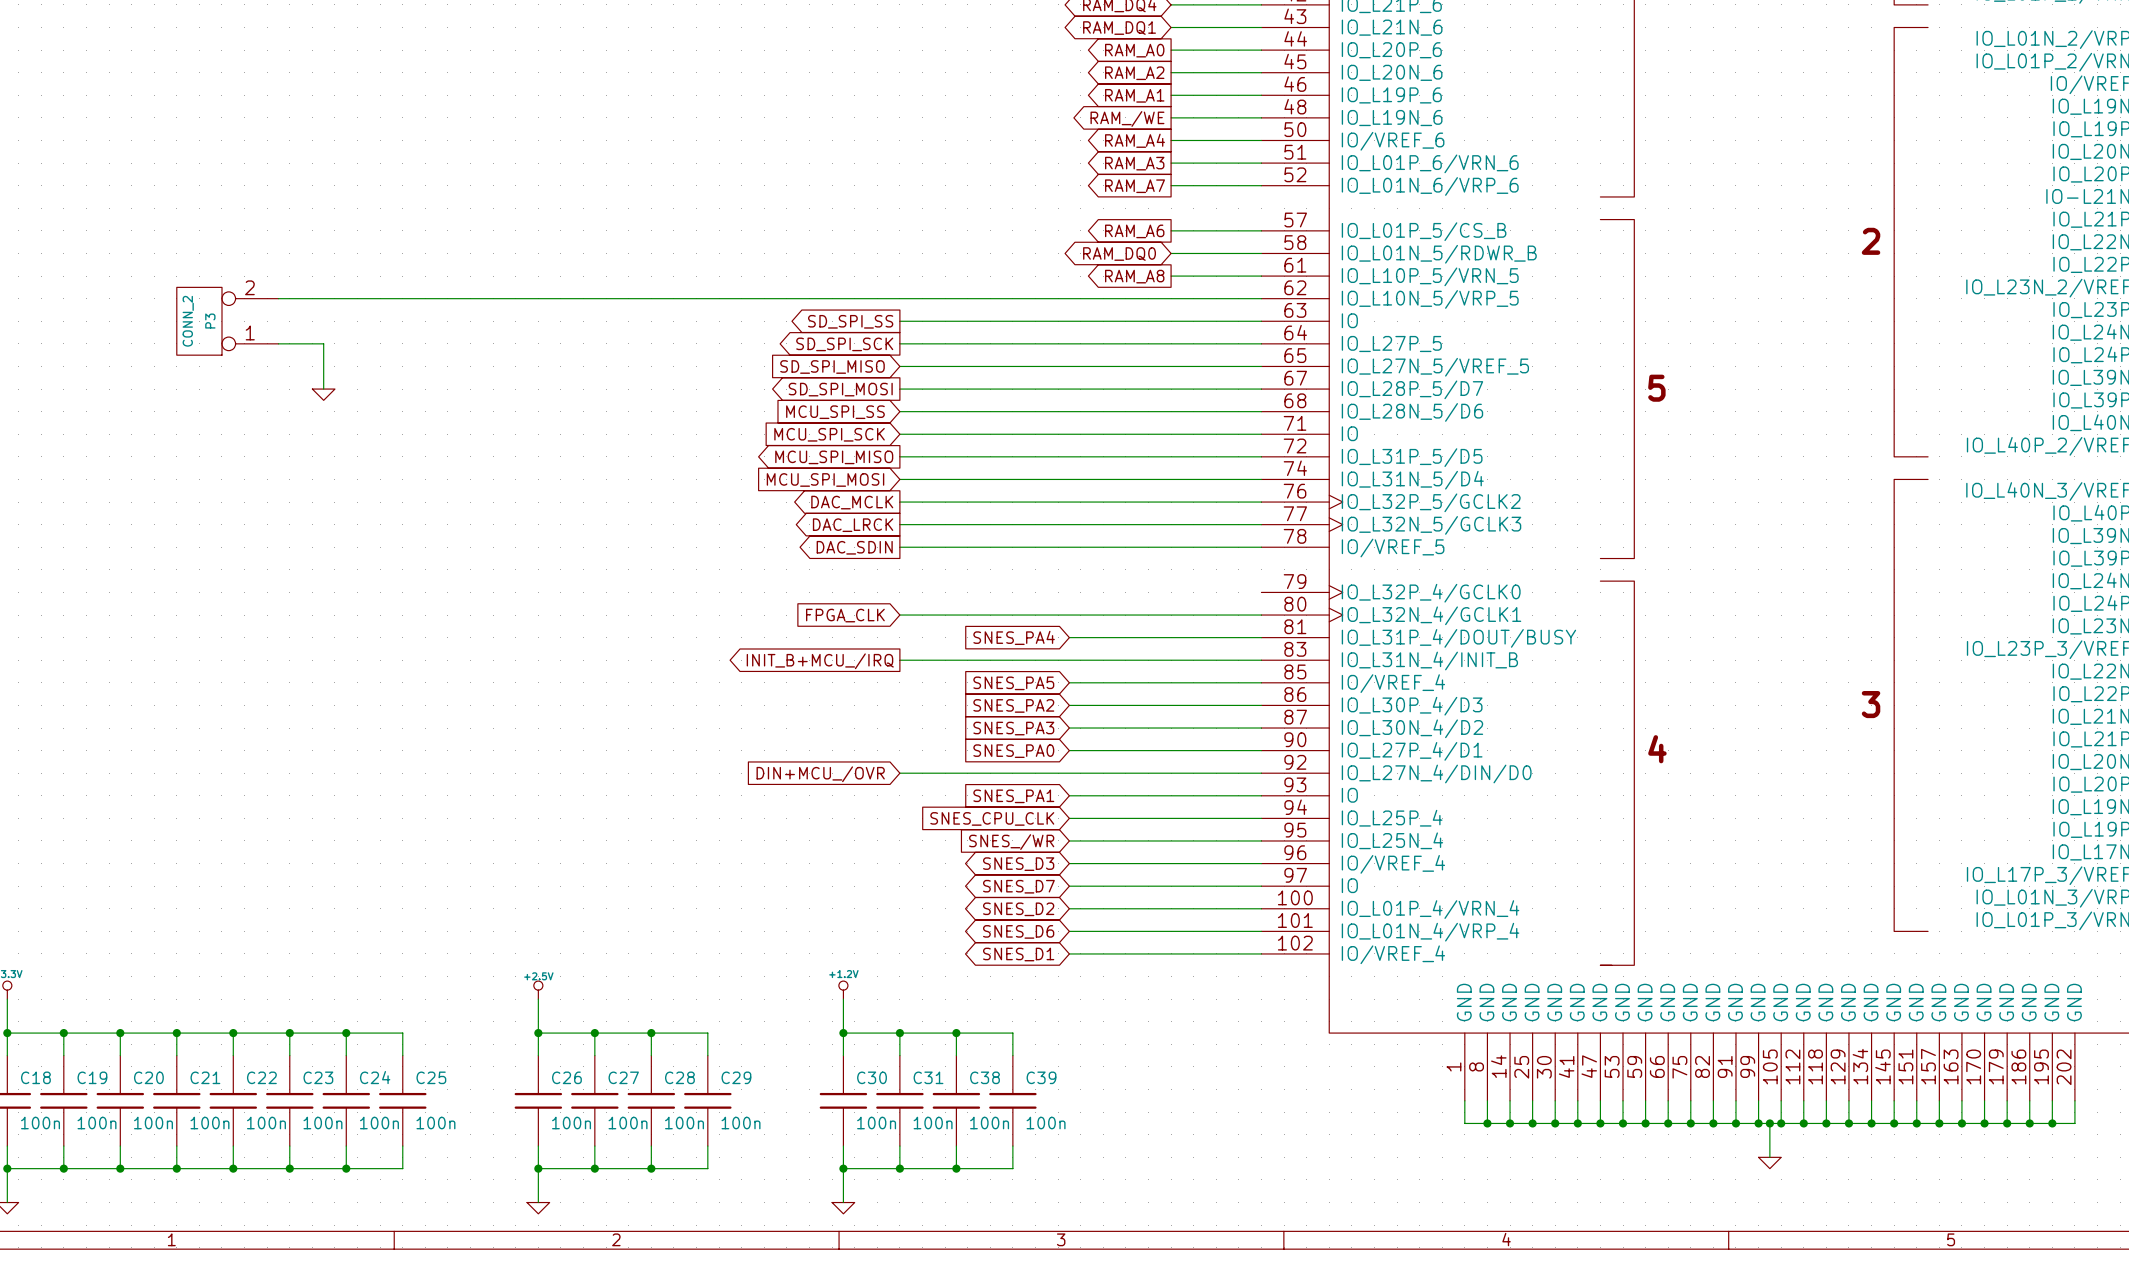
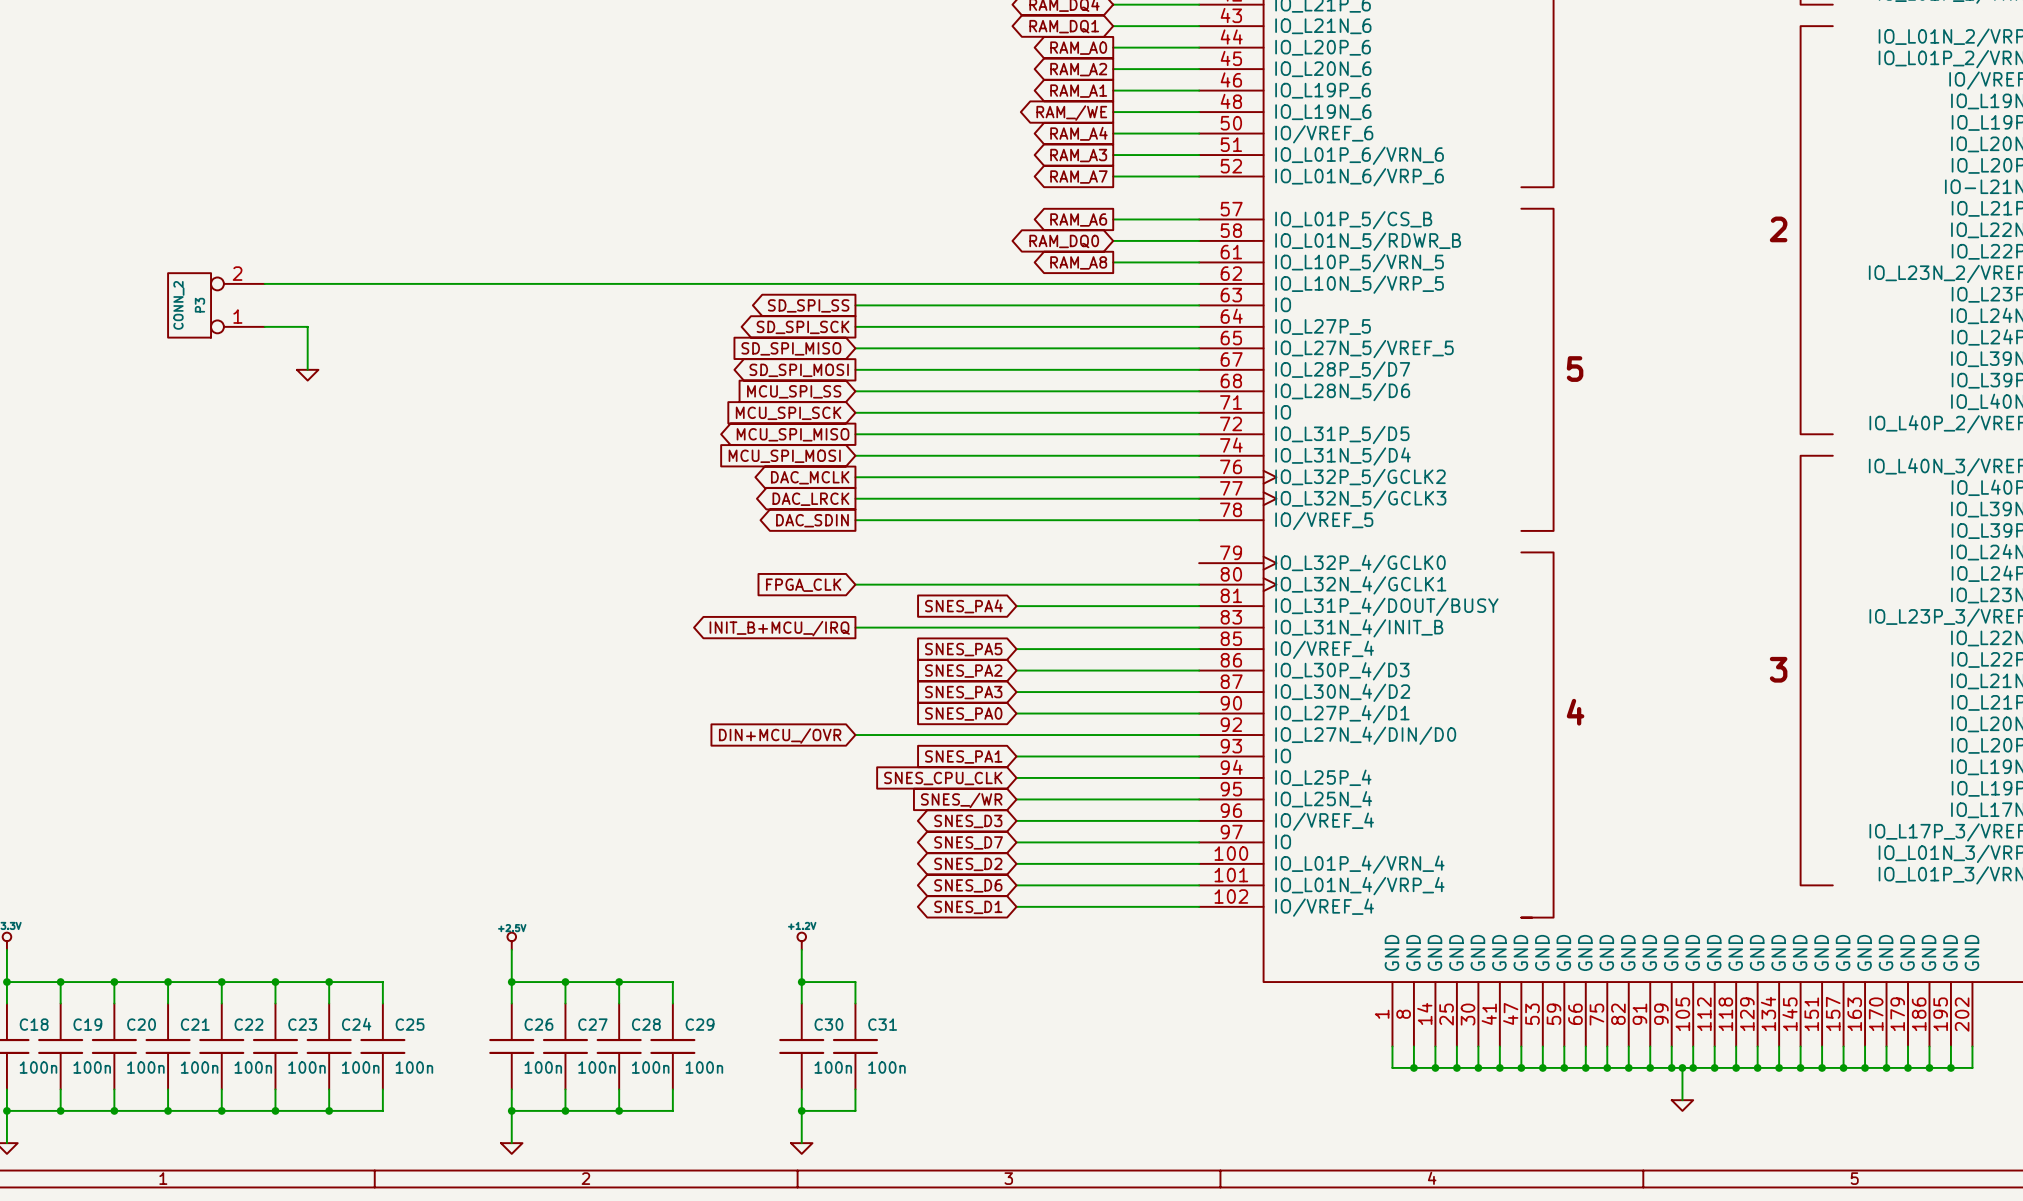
wire: (899, 1033) (1012, 1033) (1012, 1055) -> none
junction: (899, 1033) -> none
wire: (956, 1033) (956, 1055) -> none
junction: (956, 1033) -> none
C38: 100n (956, 1100) -> none
C39: 100n (1012, 1100) -> none
wire: (956, 1146) (956, 1168) -> none
wire: (1012, 1146) (1012, 1168) (899, 1168) -> none
junction: (899, 1168) -> none
junction: (956, 1168) -> none

